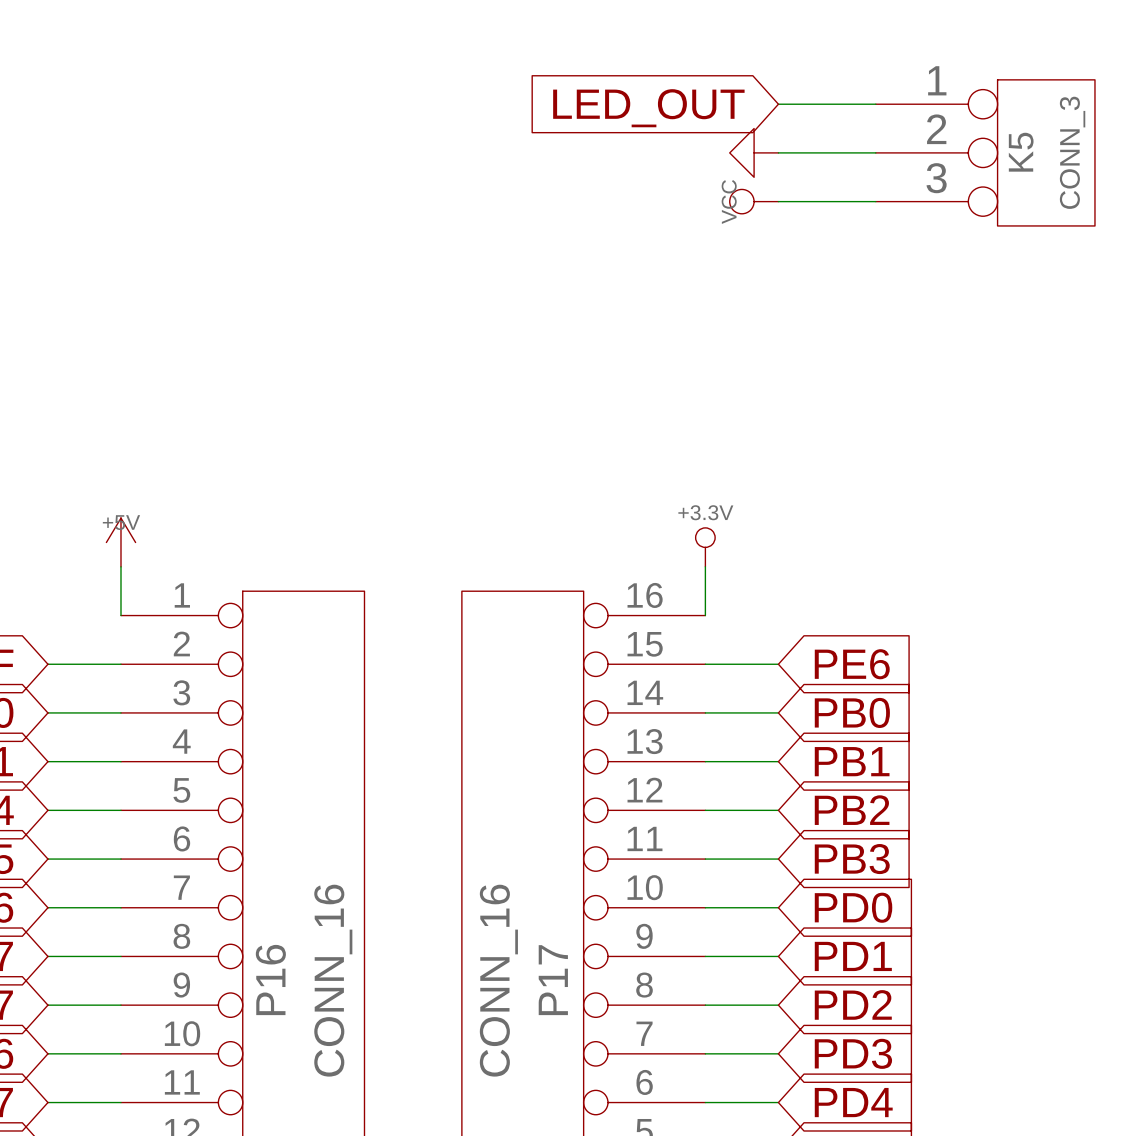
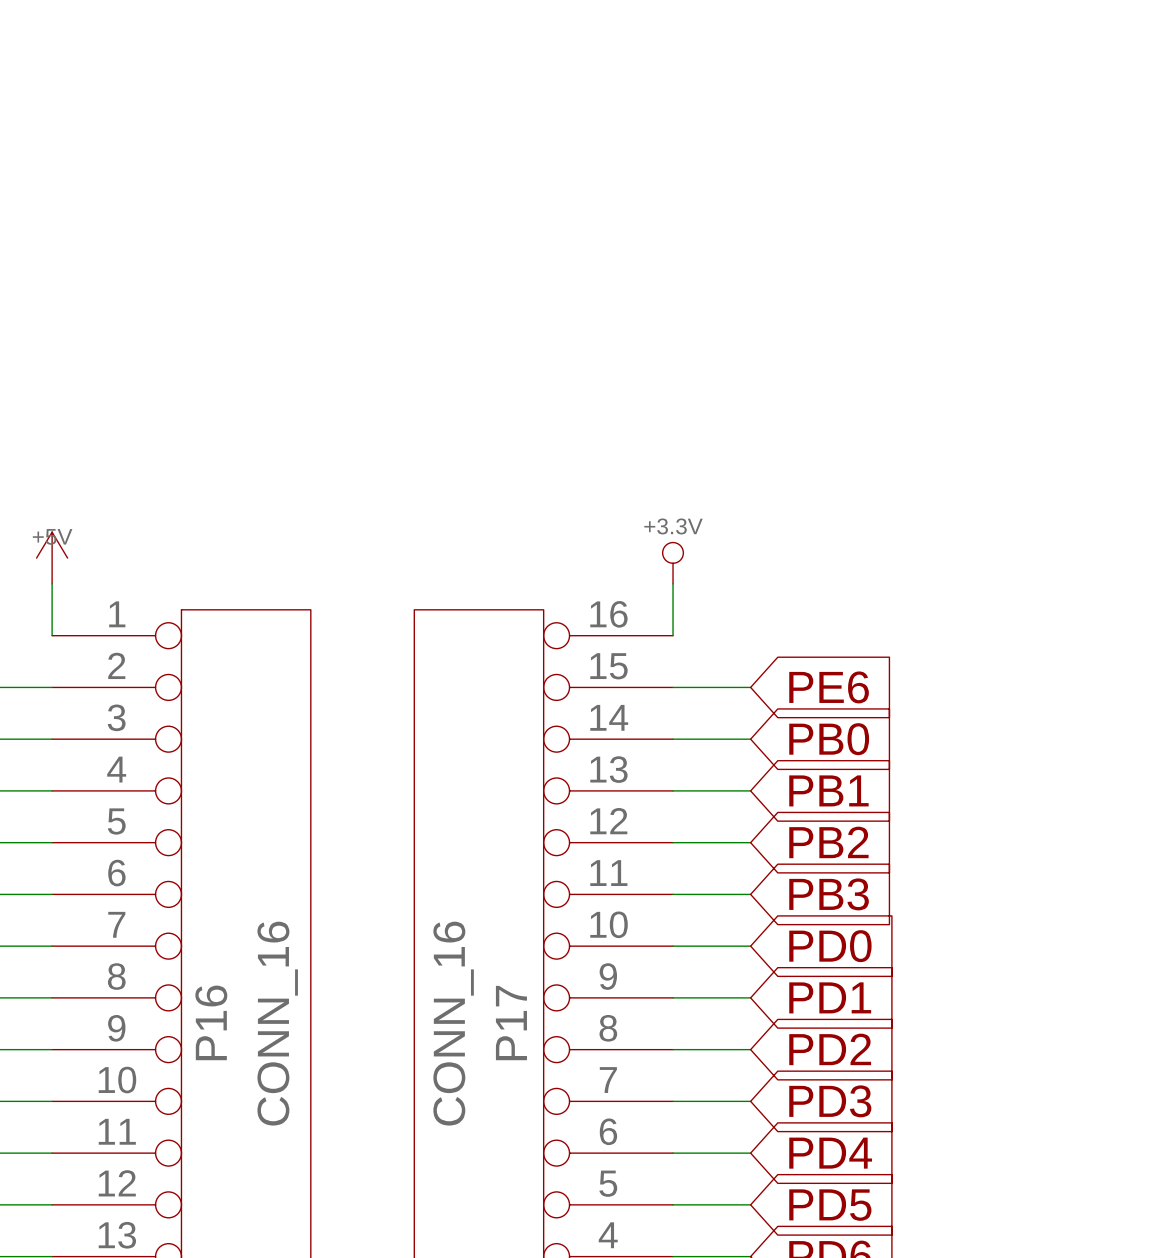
wire: (778, 104) (875, 104) -> none
global label: LED_OUT (648, 108) -> none
power symbol: (754, 152) -> none
wire: (778, 152) (875, 152) -> none
K5: CONN_3 (985, 152) -> none
power symbol: VCC (754, 201) -> none
wire: (778, 201) (875, 201) -> none

